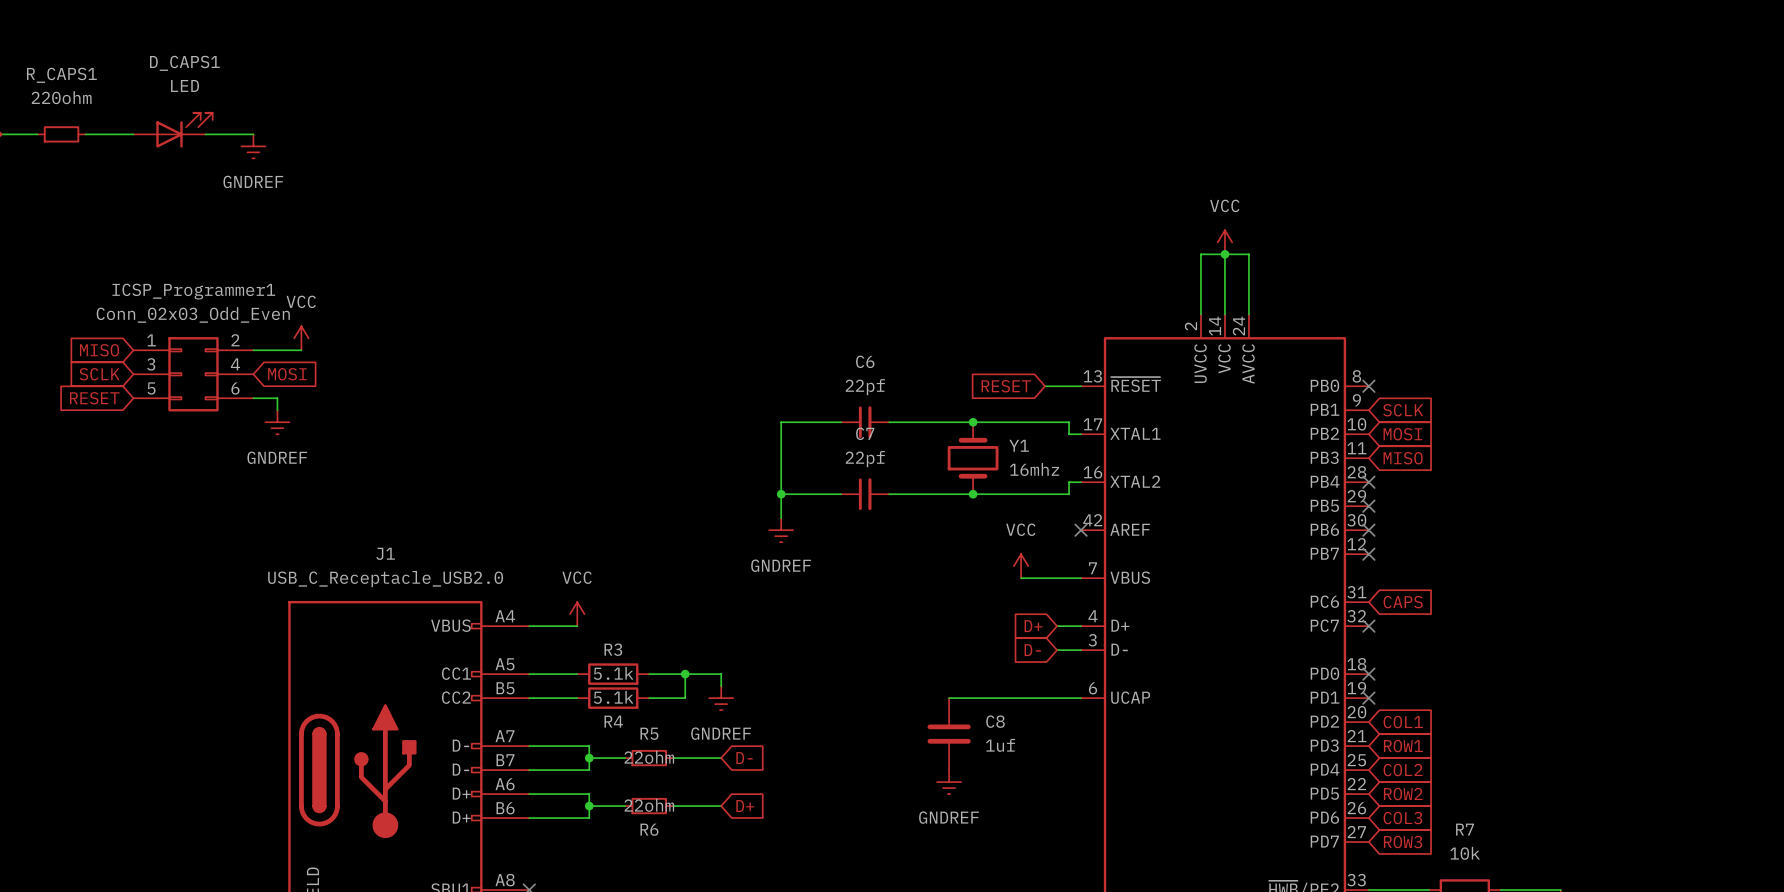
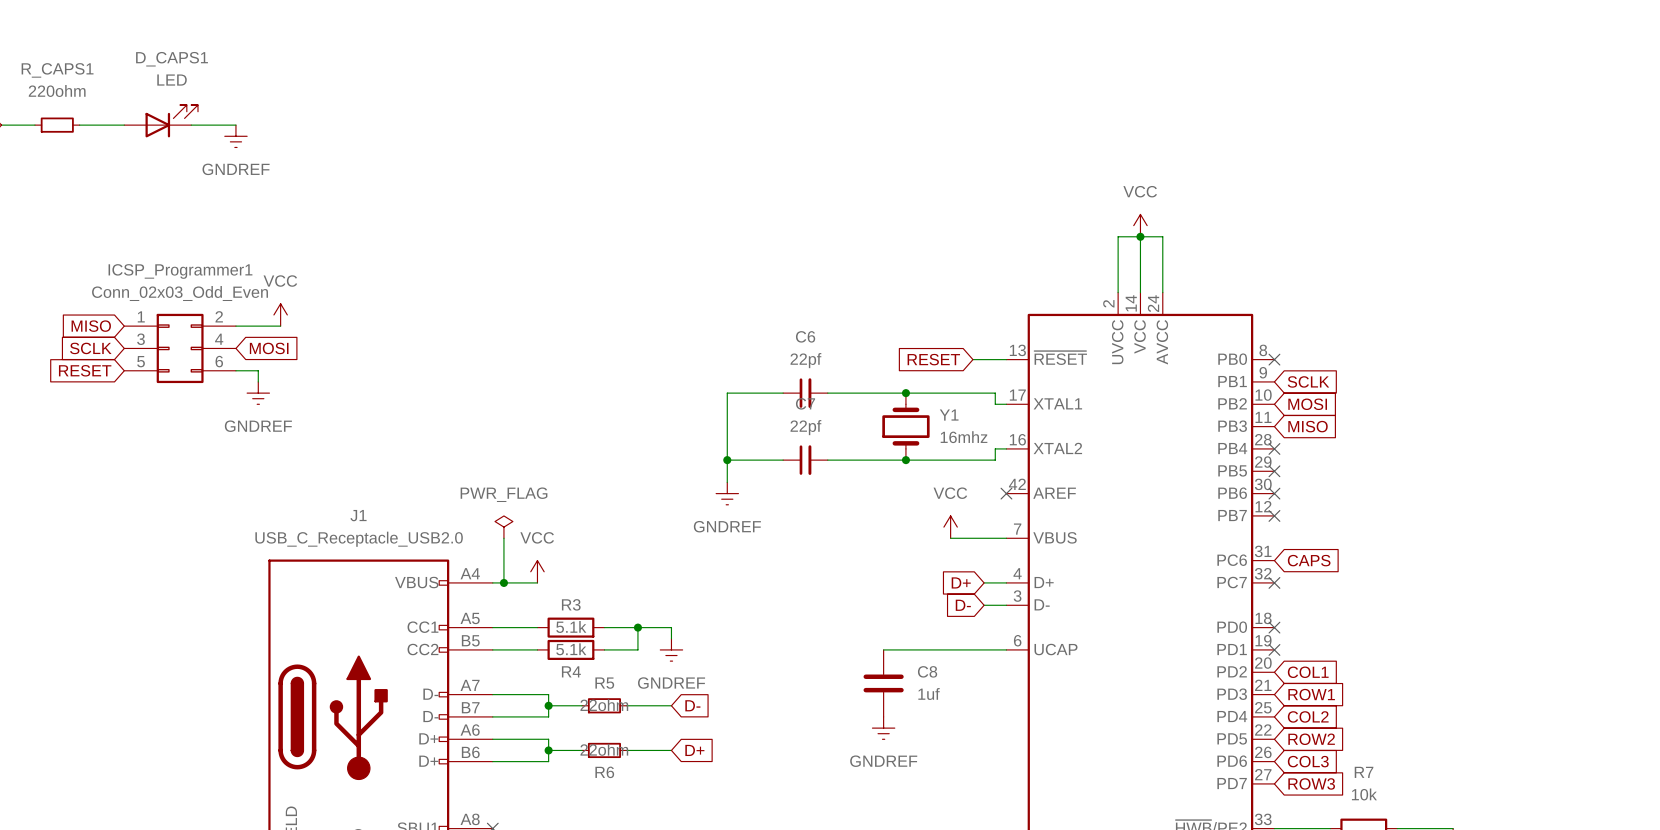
power symbol: none -> PWR_FLAG (503, 527)
wire: none -> (503, 538) (503, 582)
junction: none -> (503, 582)

